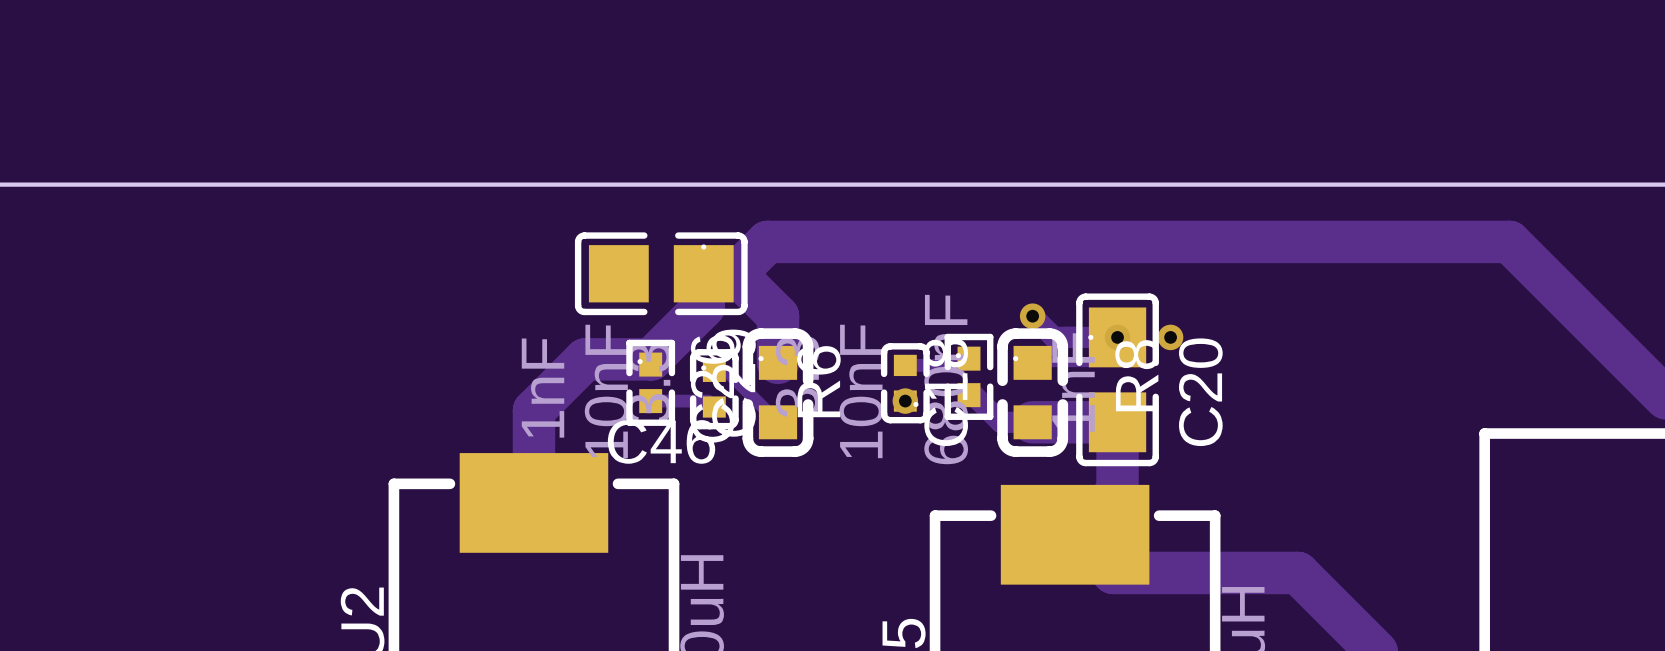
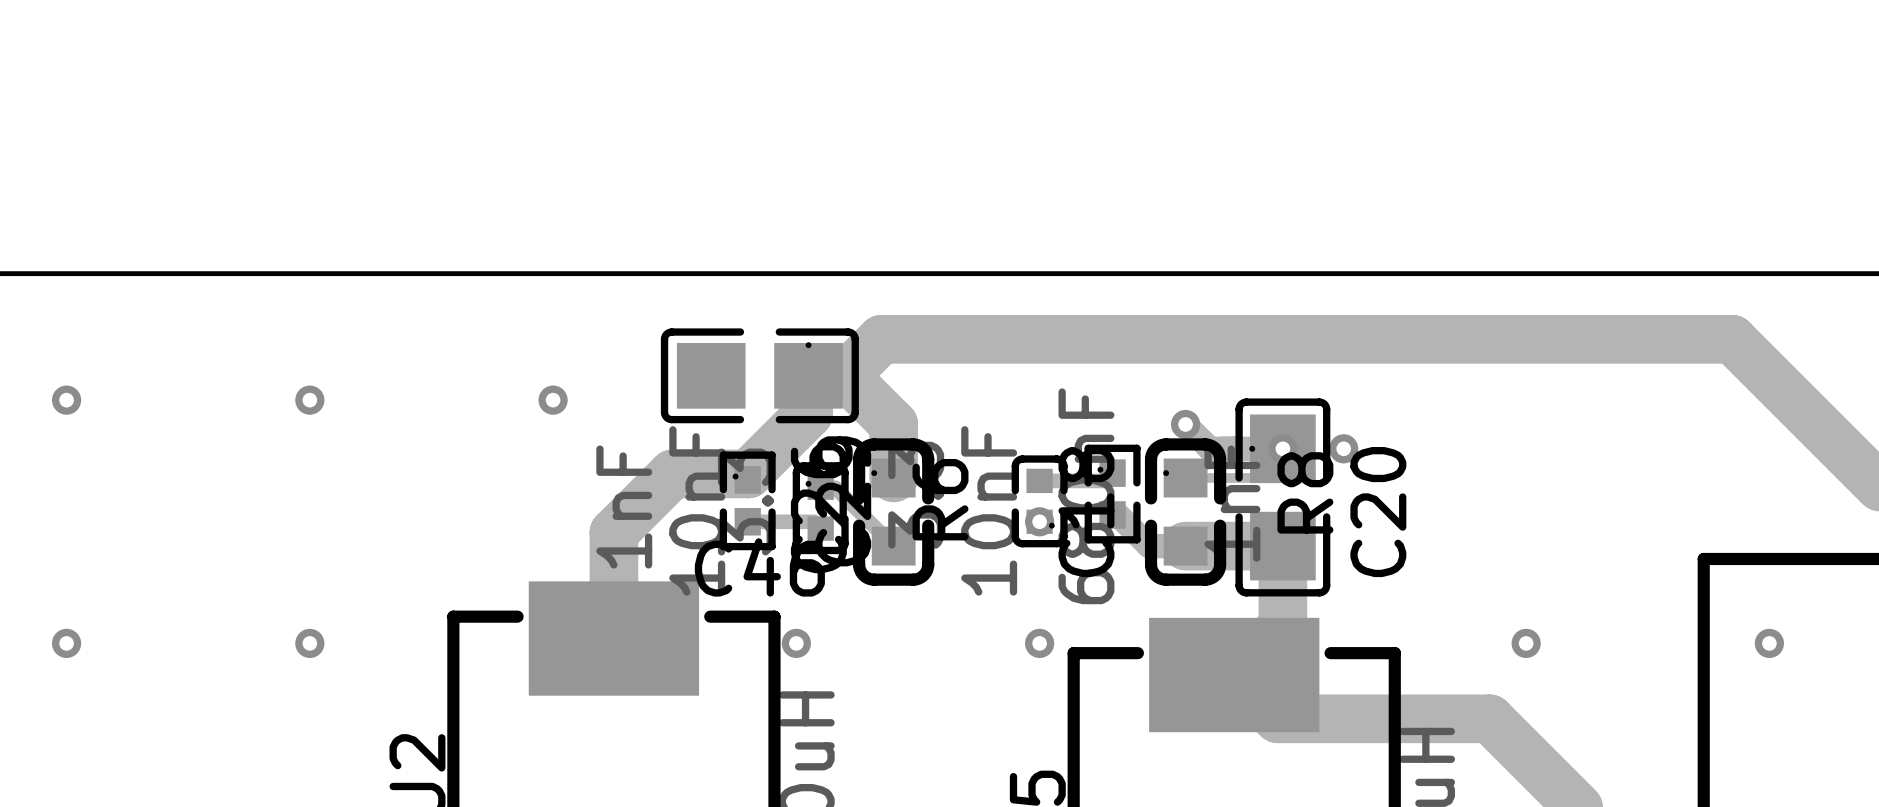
via: none -> (66, 400)
via: none -> (309, 400)
via: none -> (553, 400)
via: none -> (66, 643)
via: none -> (309, 643)
via: none -> (796, 643)
via: none -> (1039, 643)
via: none -> (1526, 643)
via: none -> (1769, 643)

